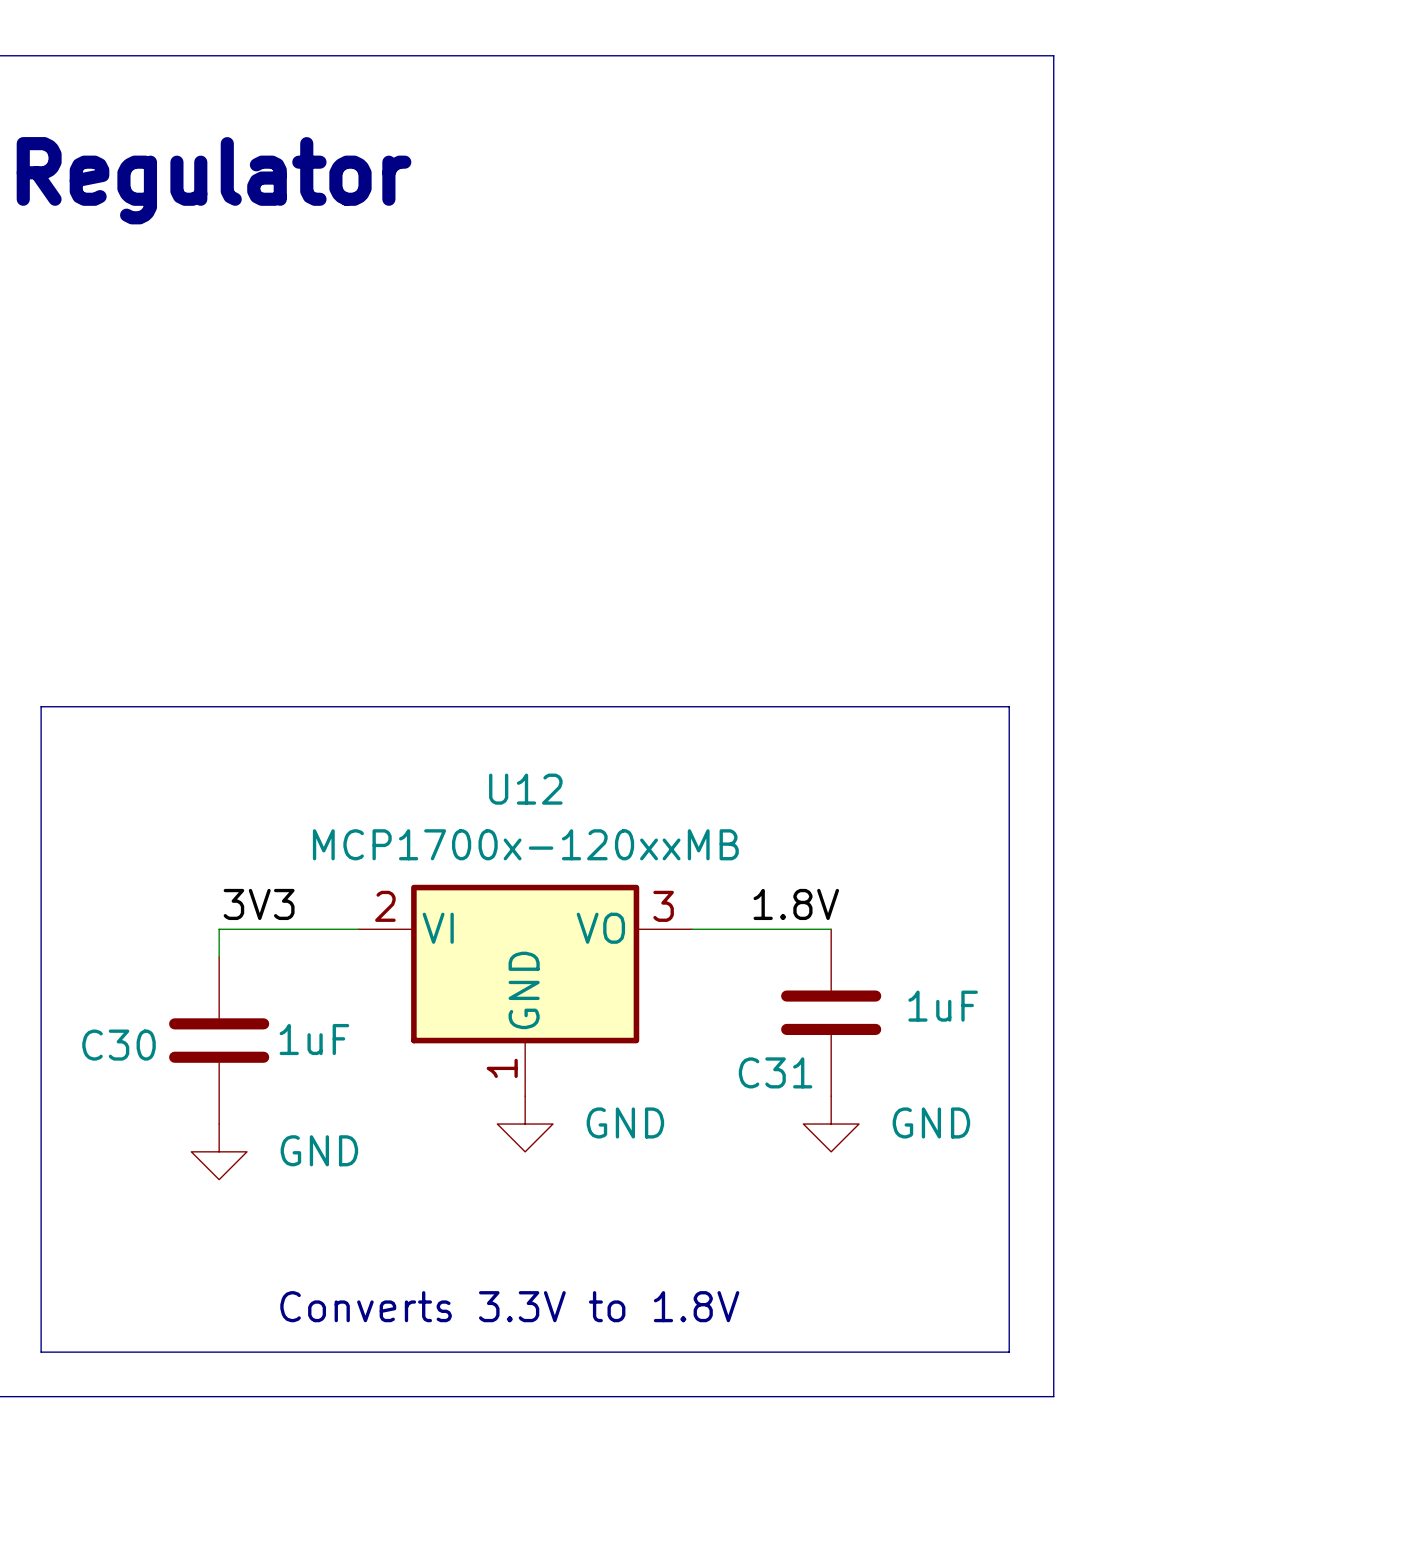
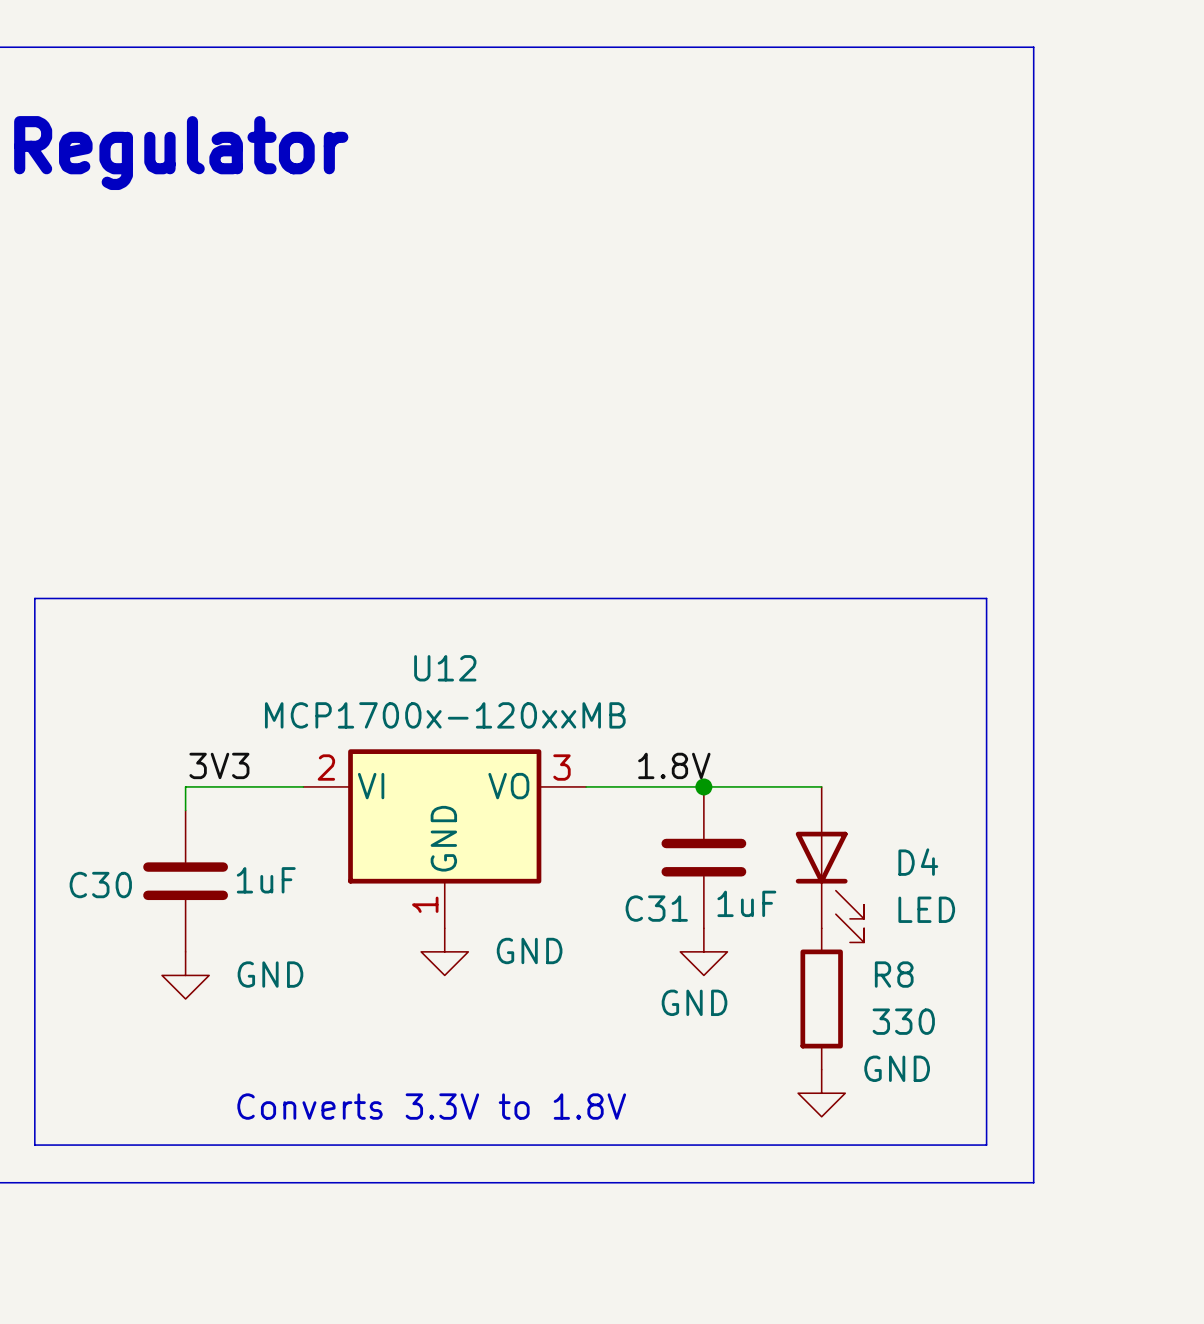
line: (1053, 55) (1053, 1396) -> (892, 47) (1033, 47) (1033, 1182) (892, 1182)
line: (1009, 706) (1009, 1352) -> (854, 598) (986, 598) (986, 1145) (854, 1145)
wire: none -> (703, 786) (821, 786)
junction: none -> (703, 786)
C31 value position: 1uF (943, 1006) -> 1uF (746, 903)
D4: none -> LED (829, 864)
power symbol text position: GND (931, 1122) -> GND (694, 1002)
R8: none -> 330 (821, 998)
power symbol: none -> GND (821, 1093)

